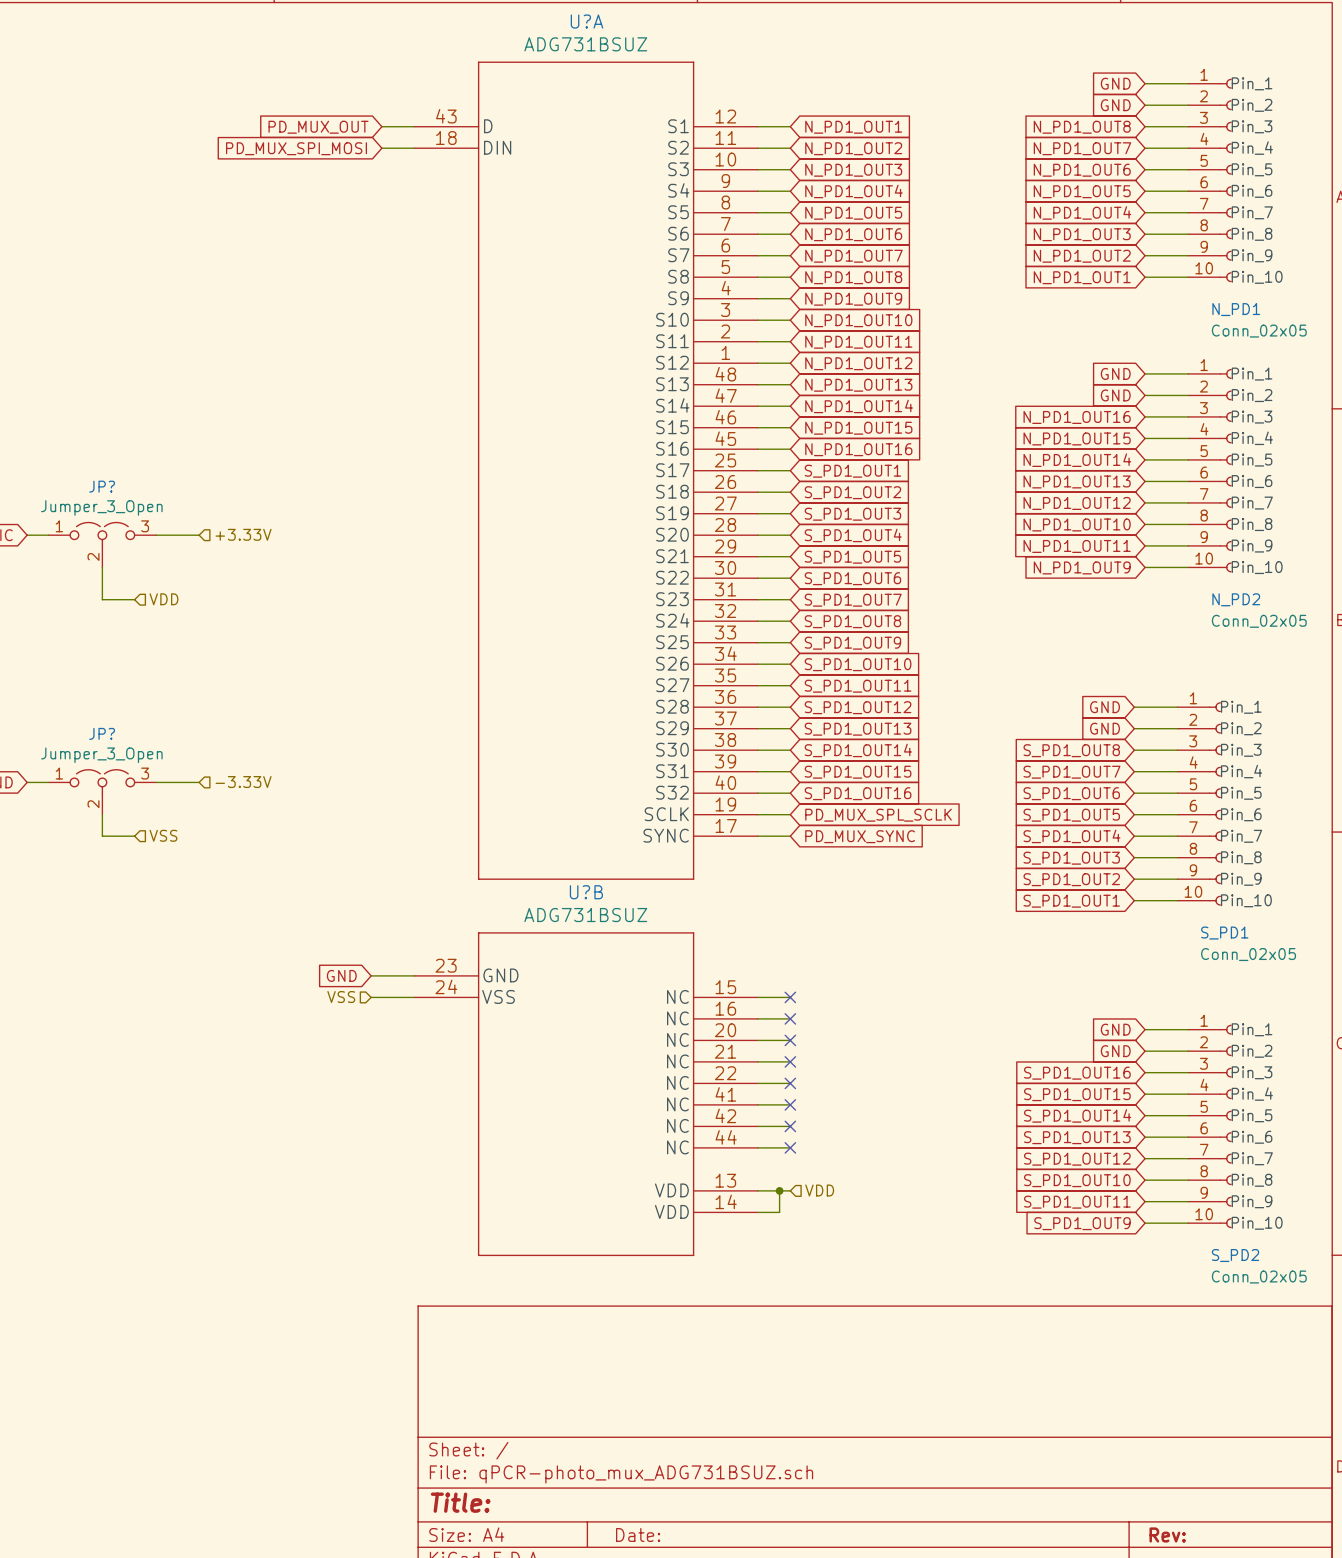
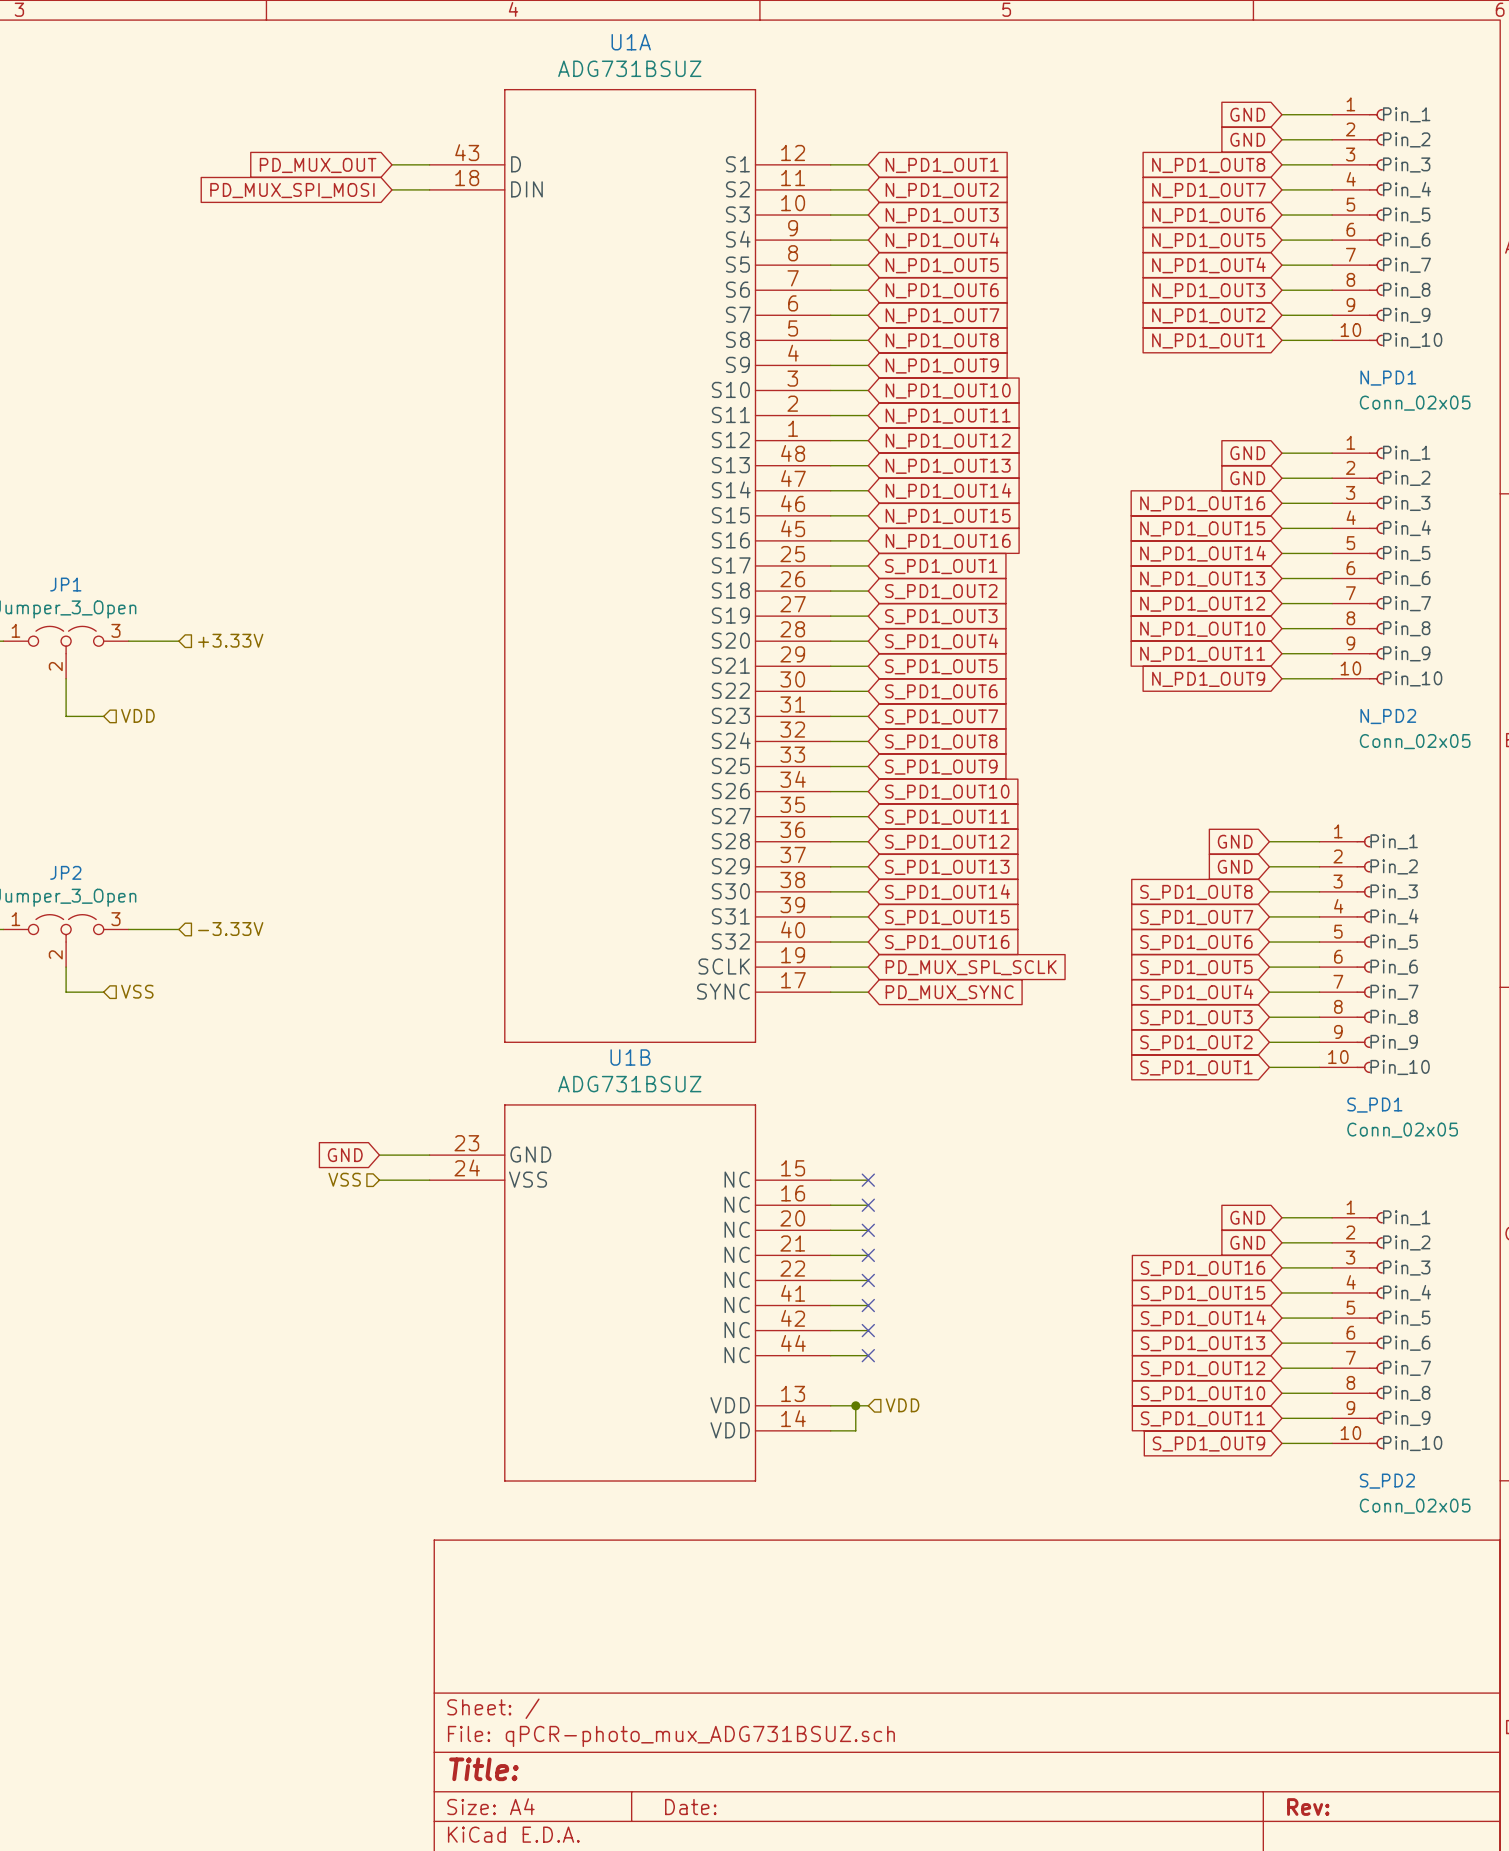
U?A name: U?A (587, 21) -> U1A (631, 42)
JP? name: JP? (102, 486) -> JP1 (65, 584)
JP? name: JP? (102, 733) -> JP2 (65, 872)
U?B name: U?B (586, 892) -> U1B (630, 1057)

